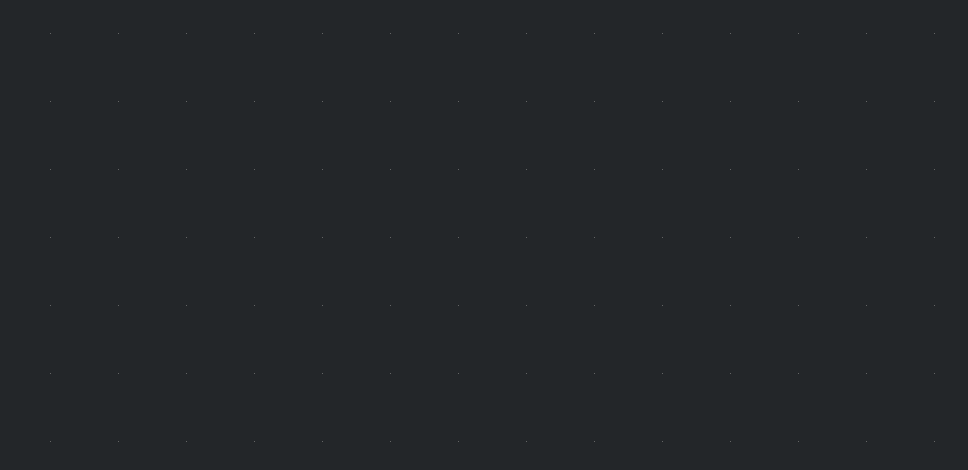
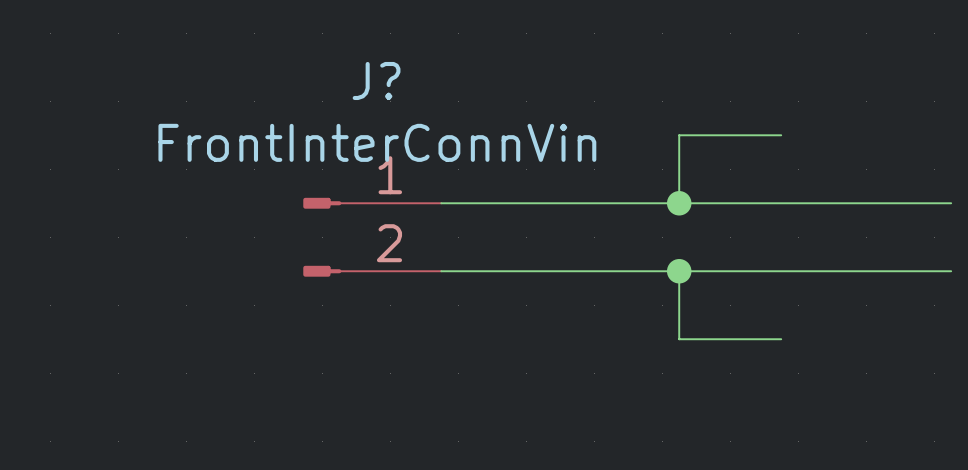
wire: none -> (781, 135) (679, 135) (679, 203)
wire: none -> (441, 203) (951, 203)
junction: none -> (679, 203)
J?: none -> FrontInterConnVin (372, 237)
wire: none -> (441, 271) (951, 271)
wire: none -> (679, 271) (679, 339) (781, 339)
junction: none -> (679, 271)

